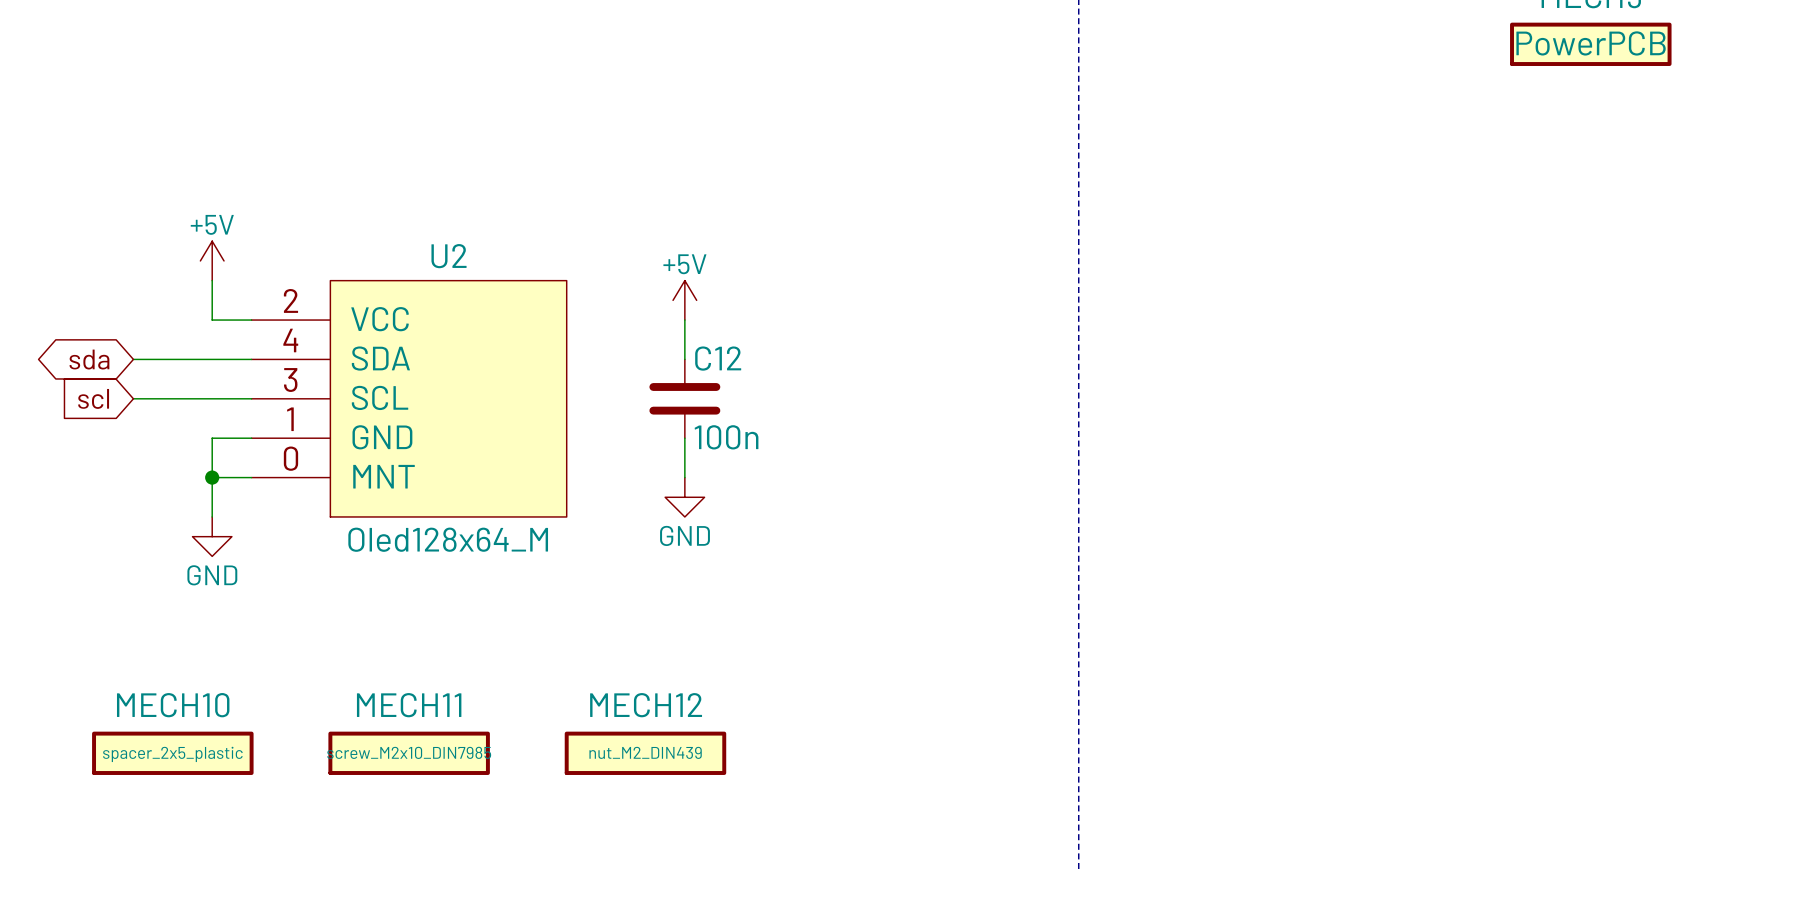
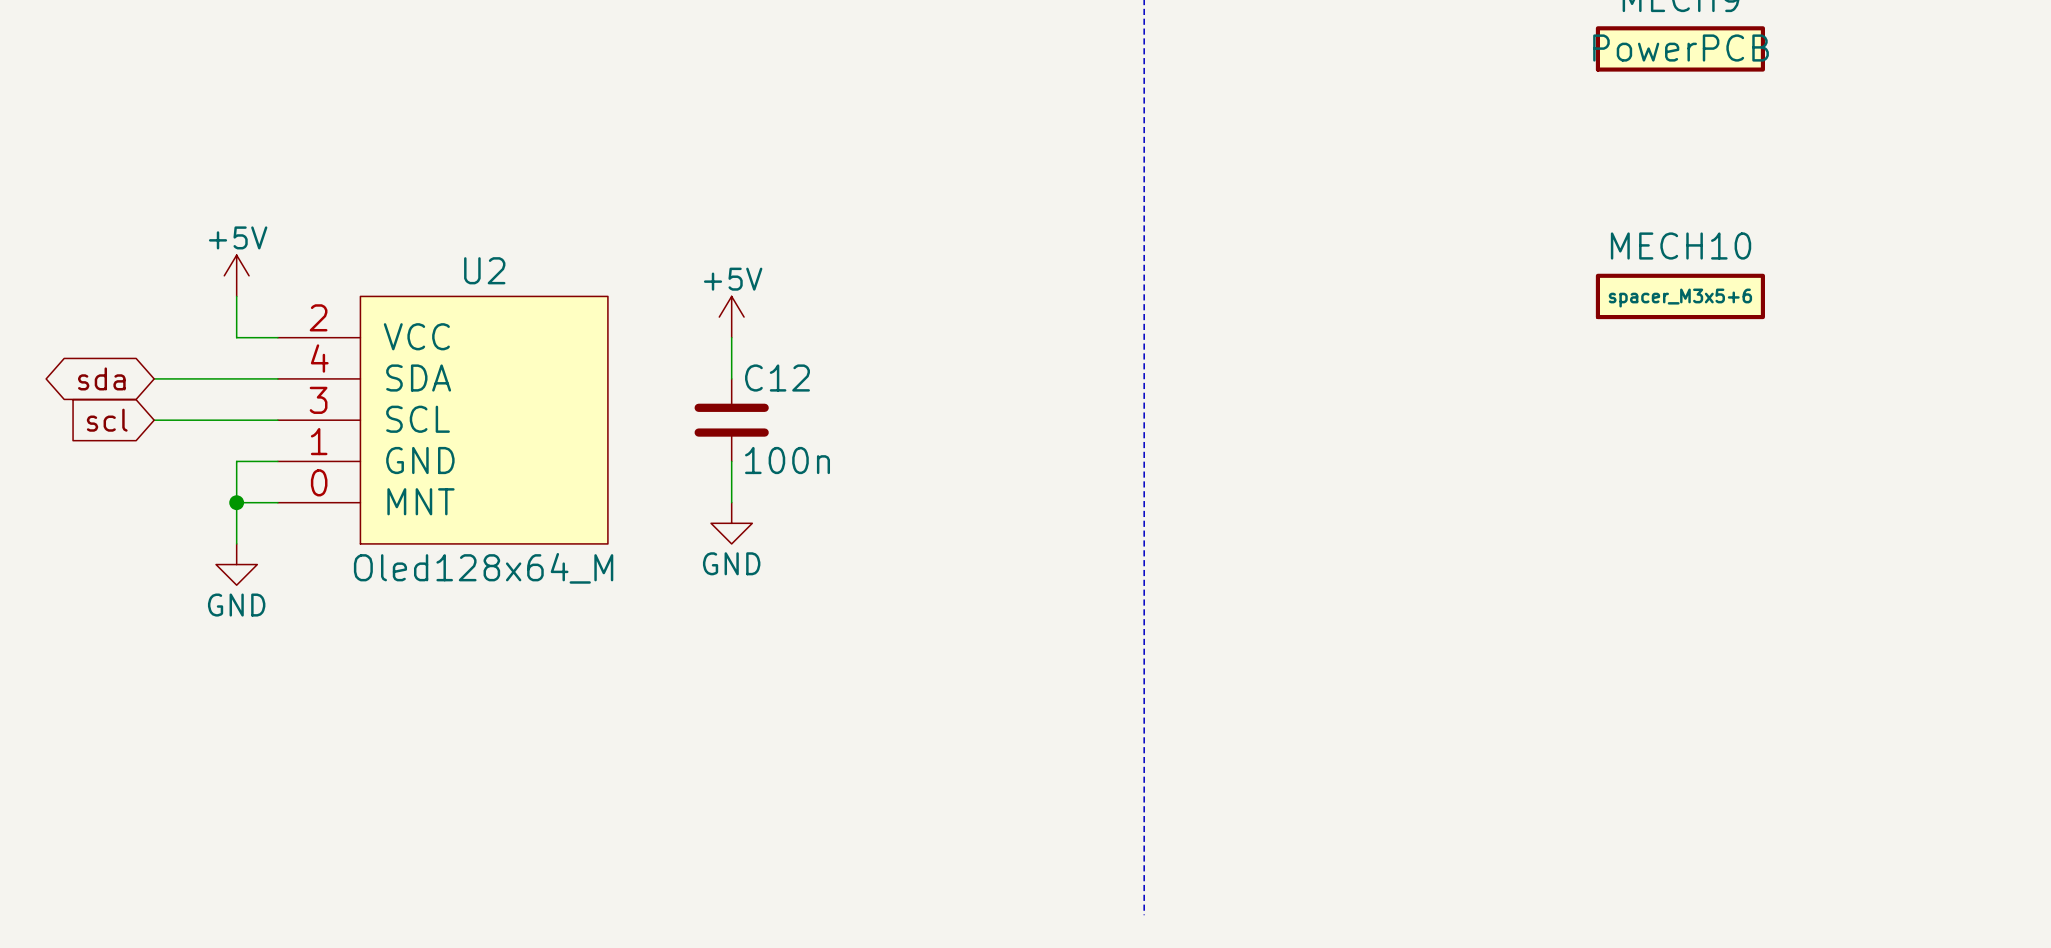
MECH10 position: (172, 753) -> (1680, 296)
MECH11: screw_M2x10_DIN7985 (409, 753) -> none
MECH12: nut_M2_DIN439 (645, 753) -> none
MECH10 value: spacer_2x5_plastic (172, 754) -> spacer_M3x5+6 (1680, 298)

